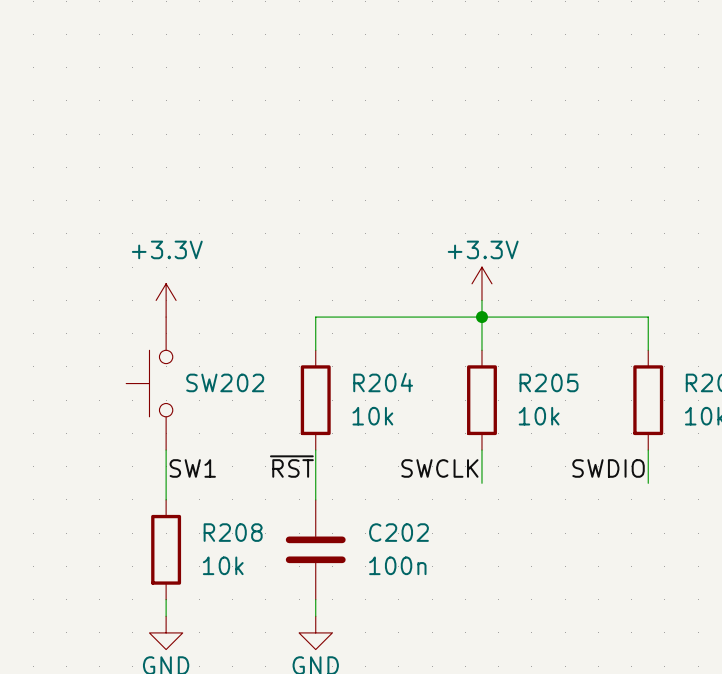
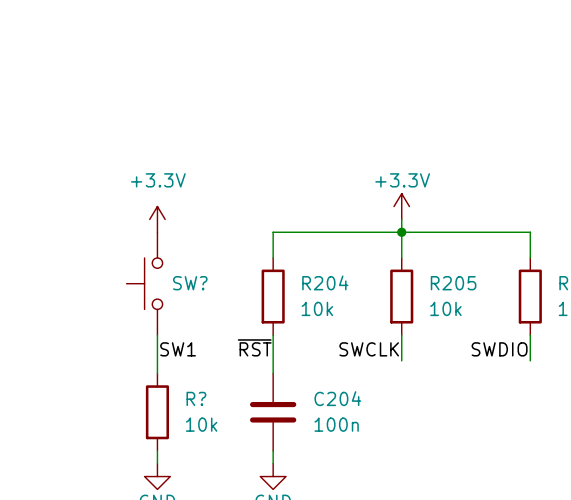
SW202 name: SW202 (225, 382) -> SW? (190, 283)
R208 name: R208 (233, 532) -> R? (196, 398)
C202 name: C202 (398, 532) -> C204 (337, 398)

